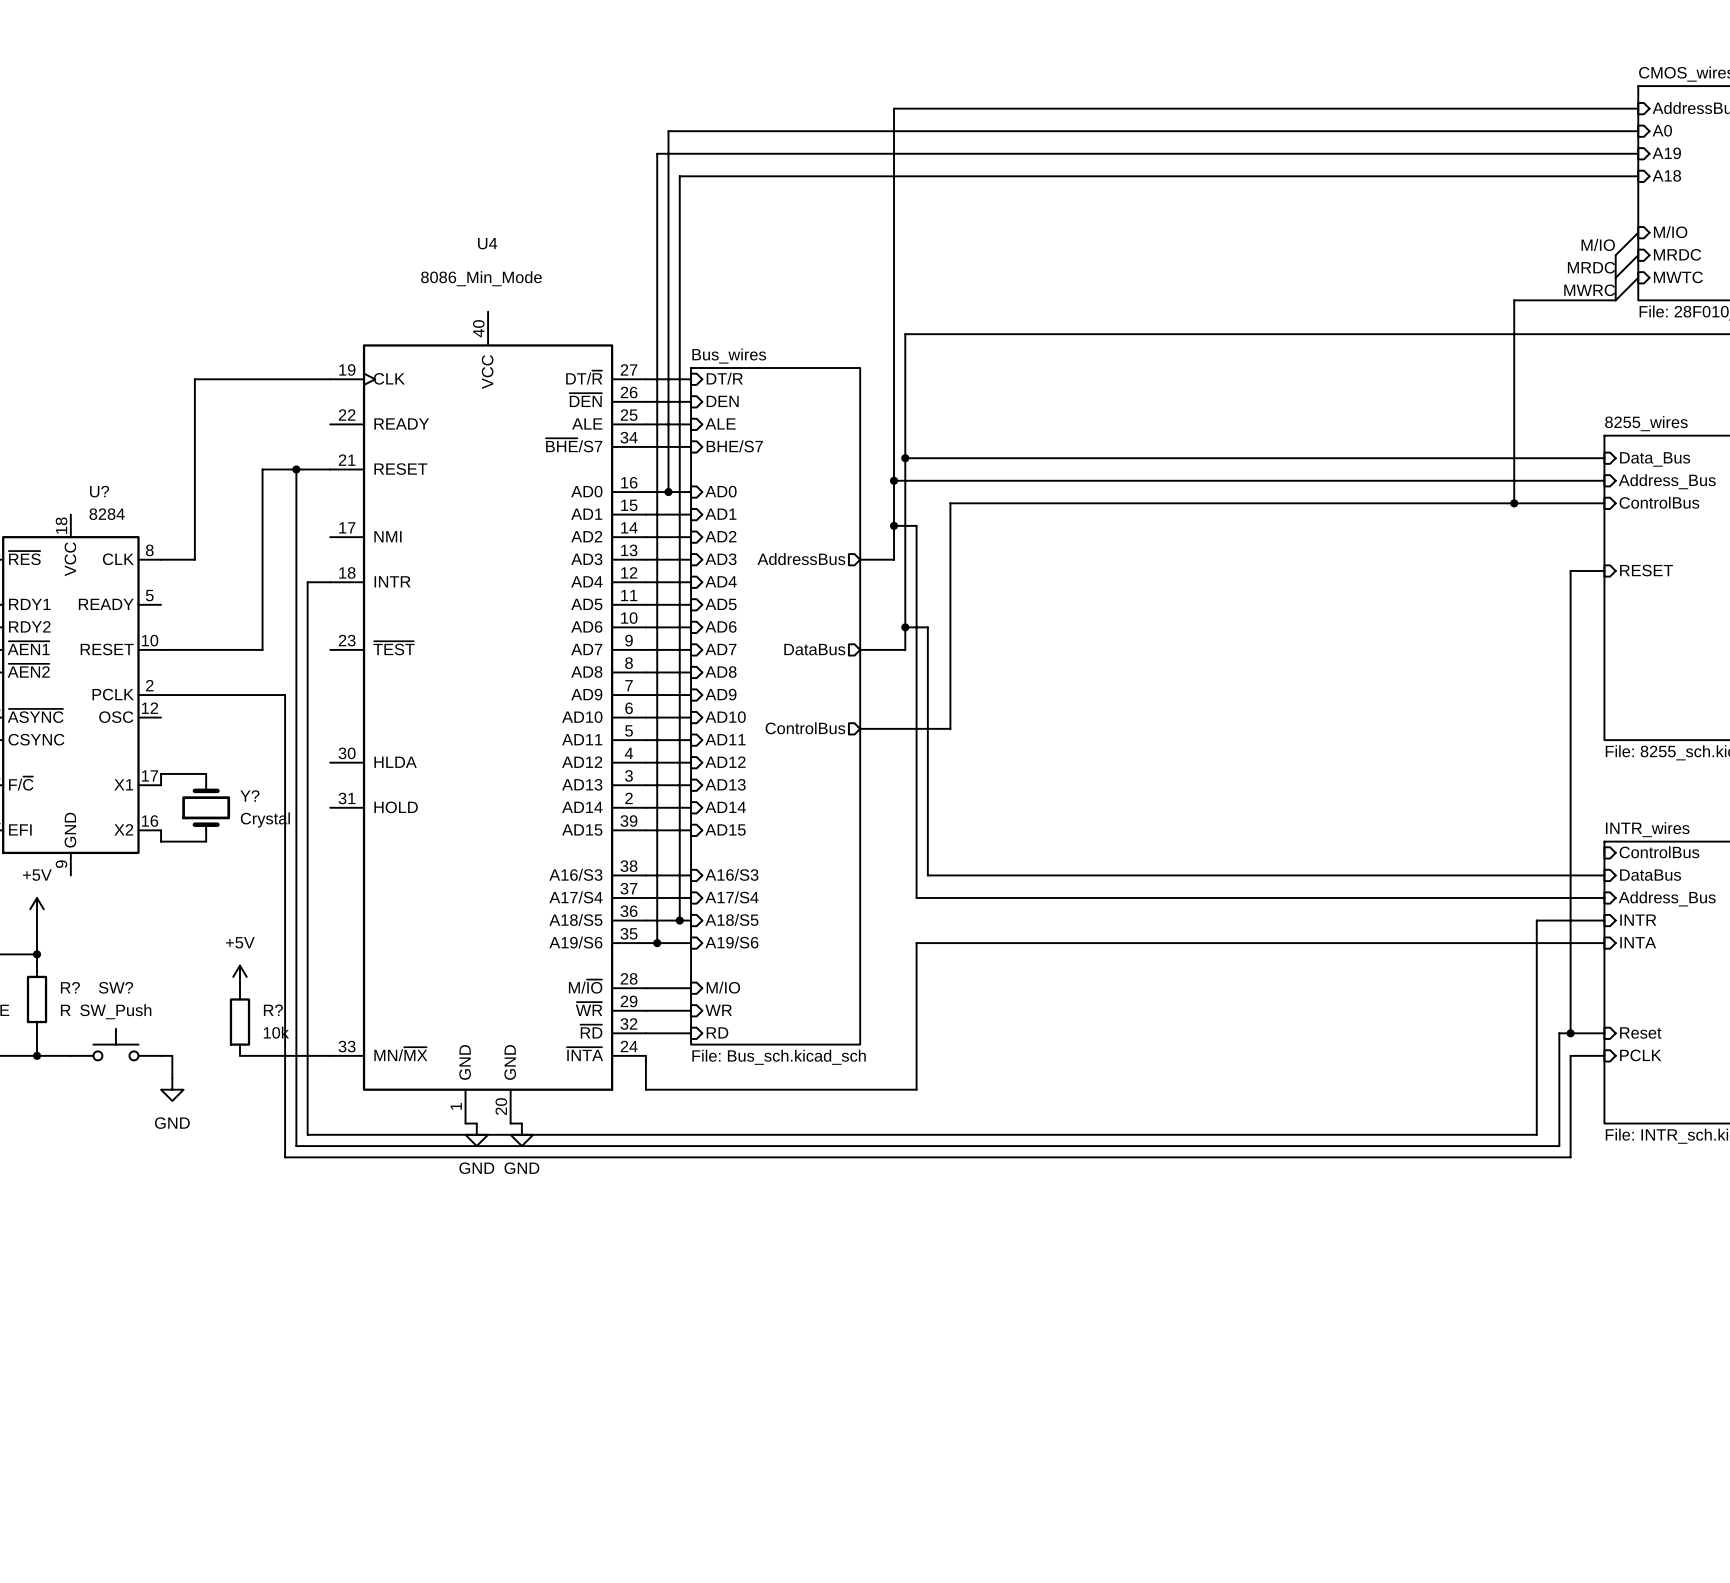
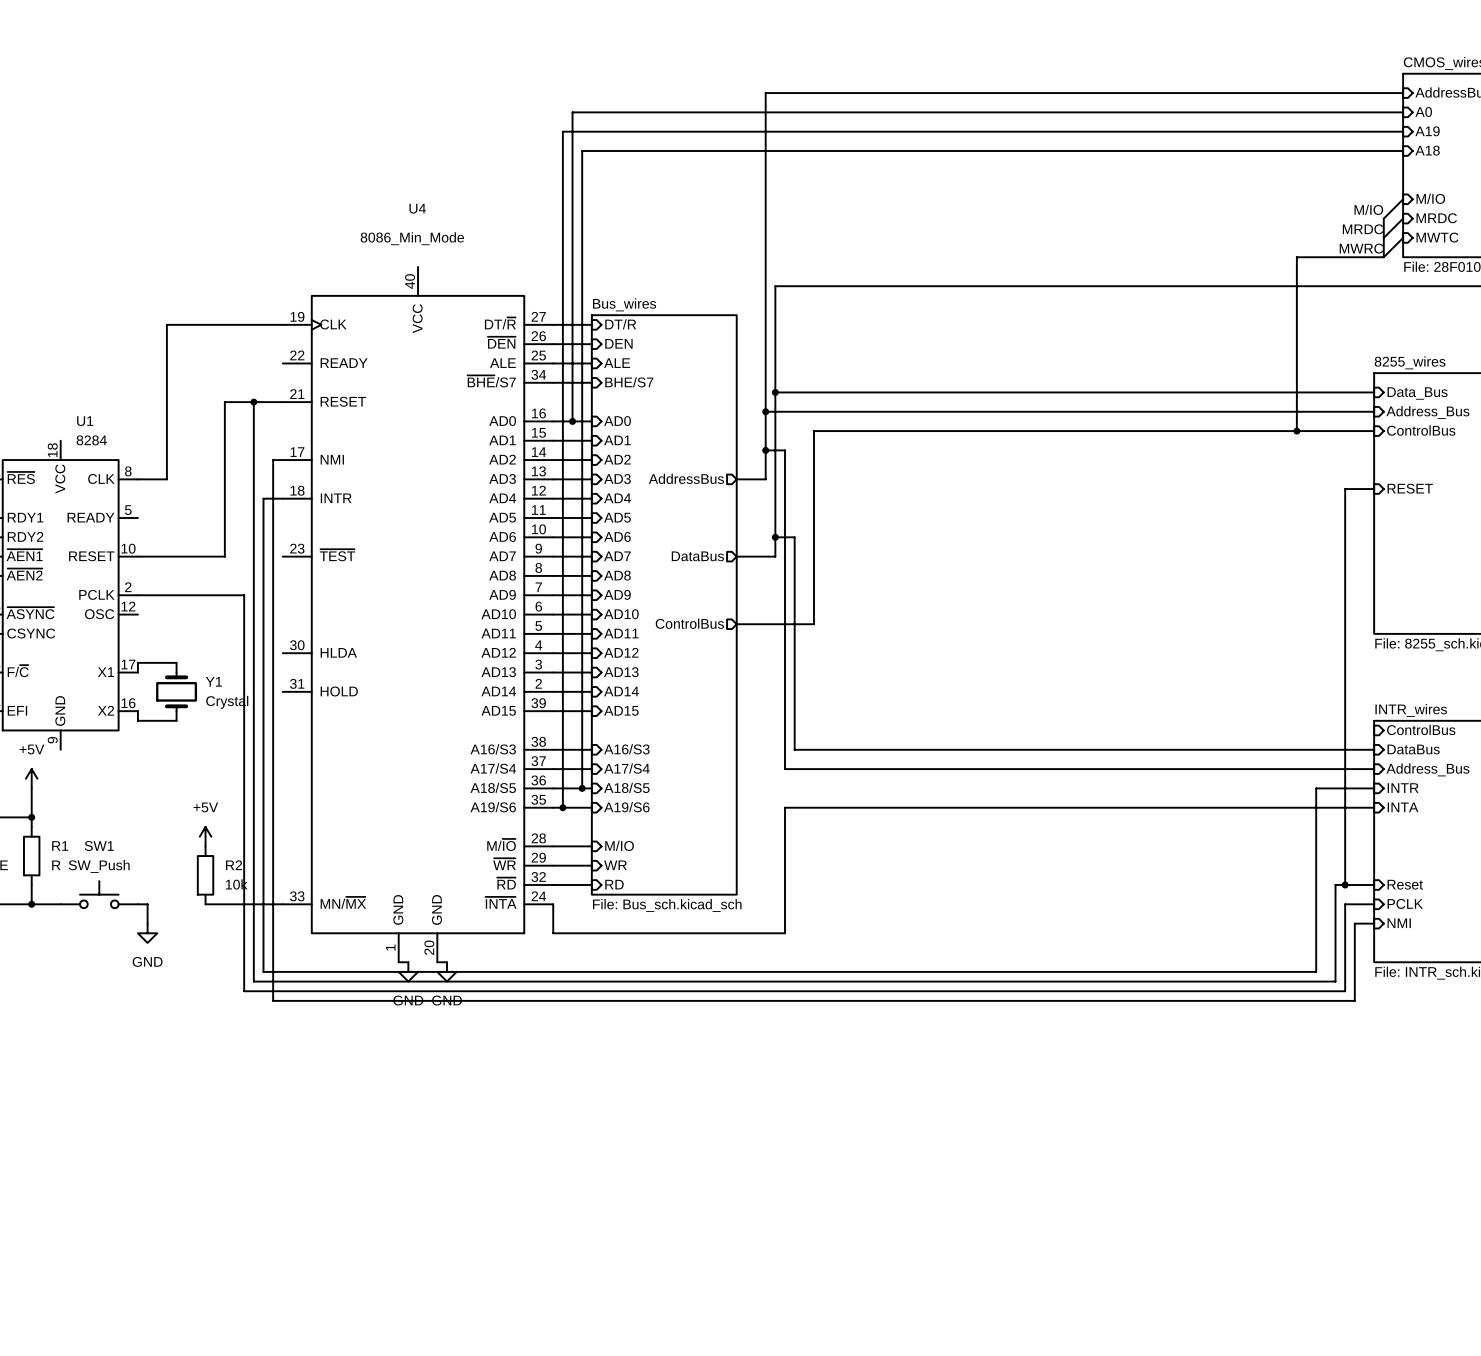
U? name: U? (99, 491) -> U1 (85, 421)
wire: none -> (282, 460) (273, 460) (273, 1000) (1354, 1000) (1354, 923) (1374, 923)
Y? name: Y? (249, 796) -> Y1 (213, 681)
R? name: R? (70, 987) -> R1 (60, 846)
SW? name: SW? (116, 987) -> SW1 (99, 846)
R? name: R? (273, 1010) -> R2 (234, 865)
sheet pin: none -> NMI (1399, 923)

